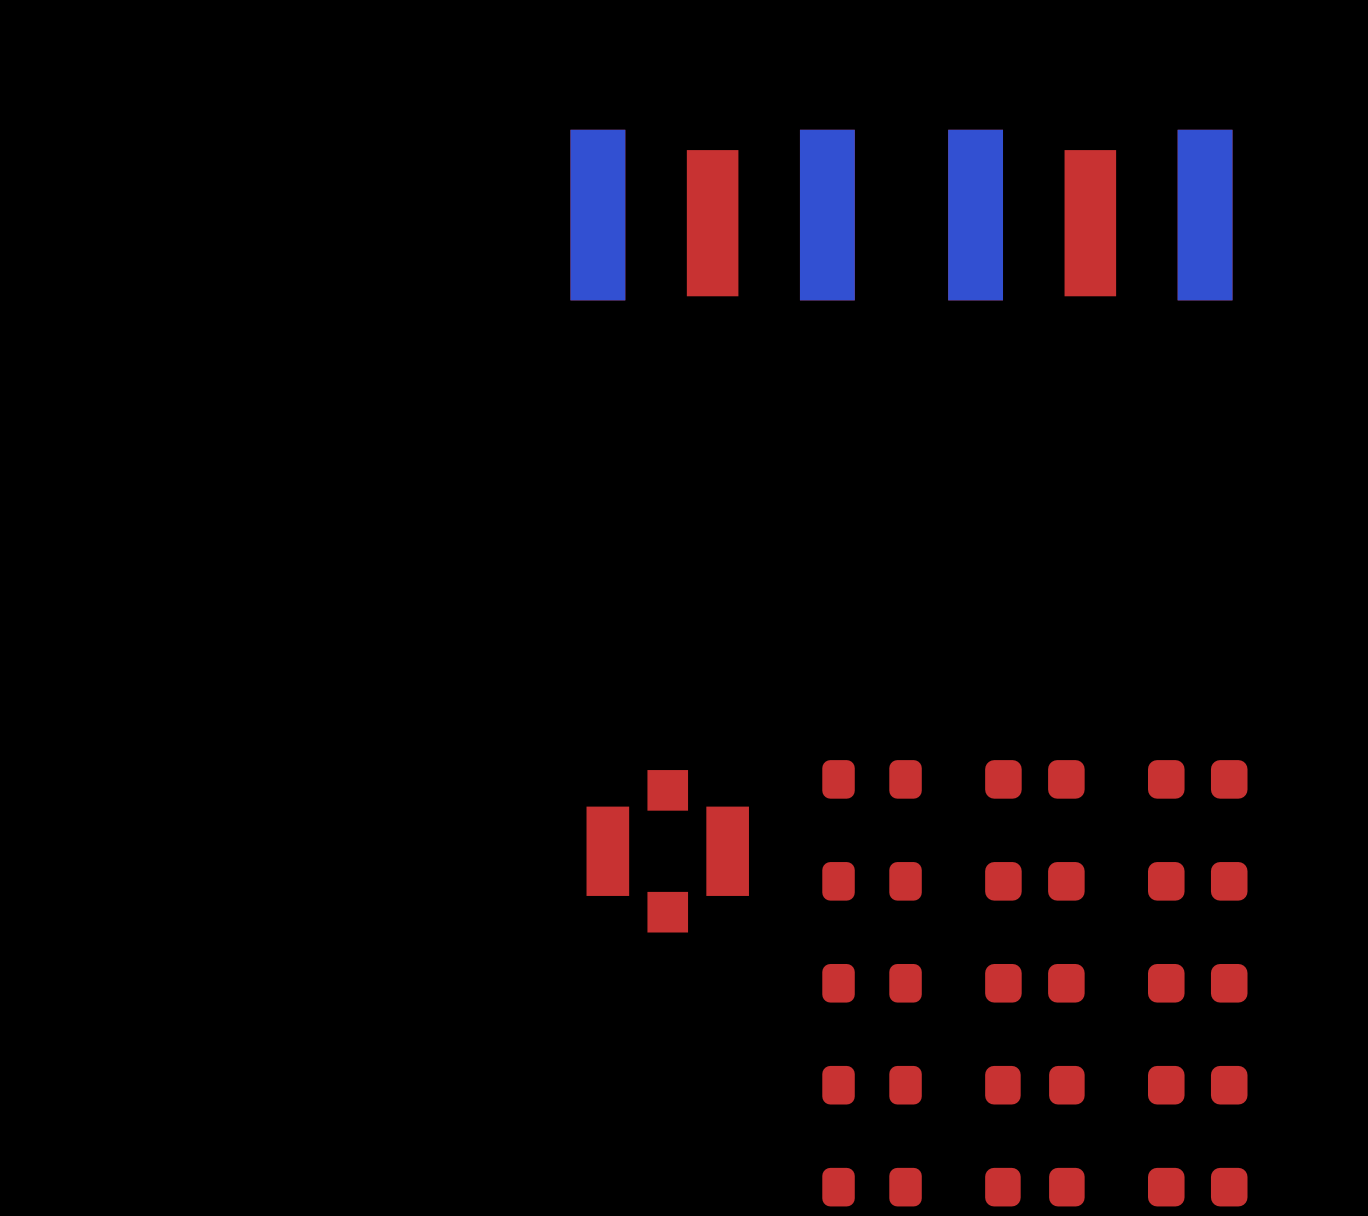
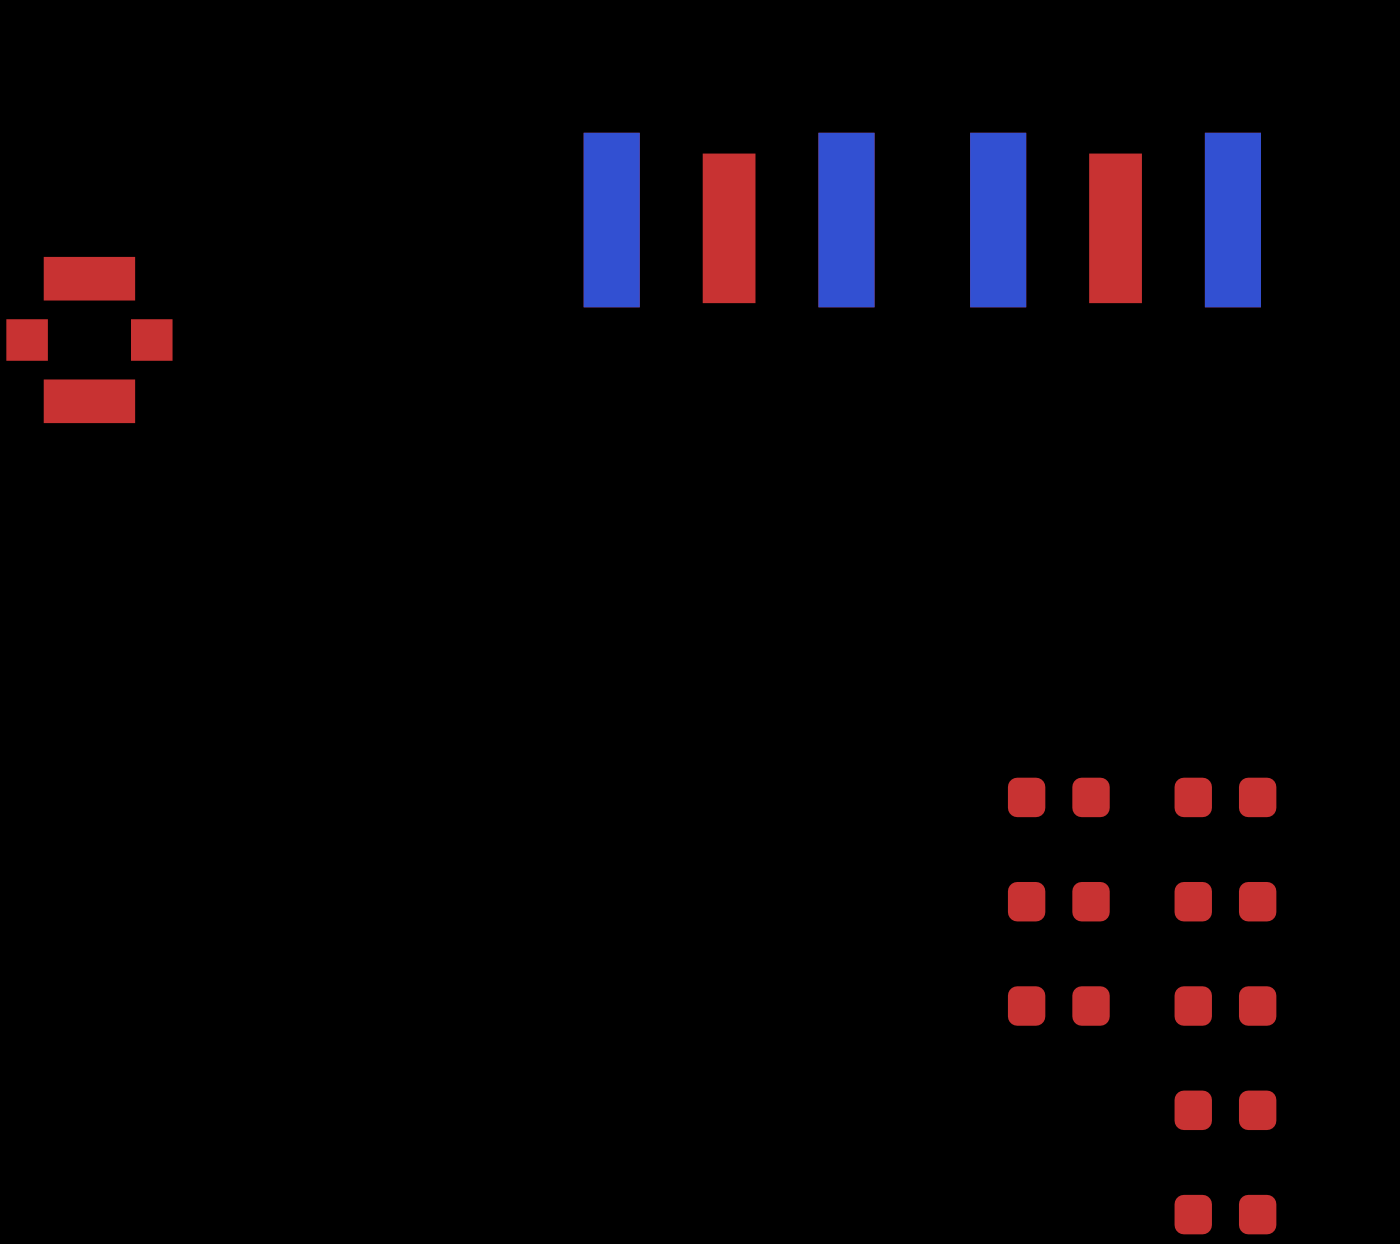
part: (872, 779) -> none
part rotation: 0° (667, 851) -> 90° clockwise (89, 340)
part position: (667, 851) -> (89, 340)
part: (872, 881) -> none
part: (872, 983) -> none
part: (872, 1085) -> none
part: (1034, 1085) -> none
part: (872, 1187) -> none
part: (1034, 1187) -> none

